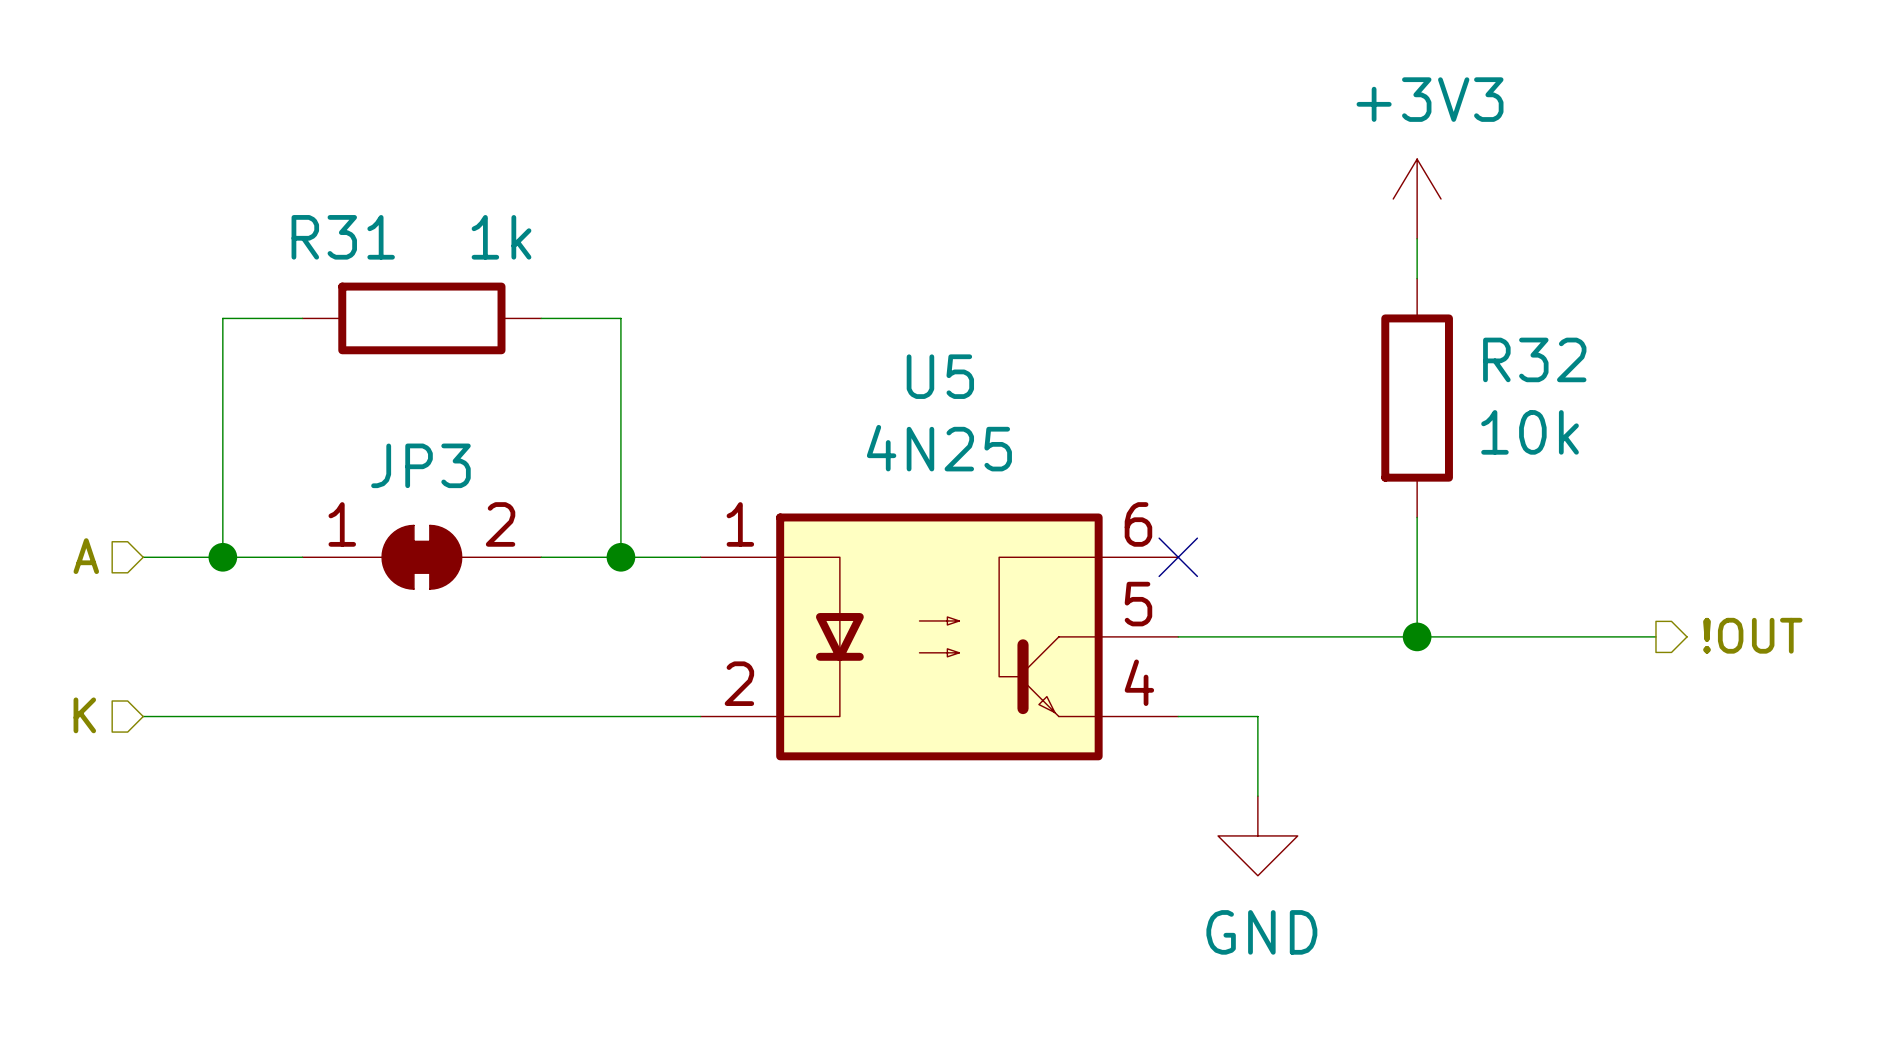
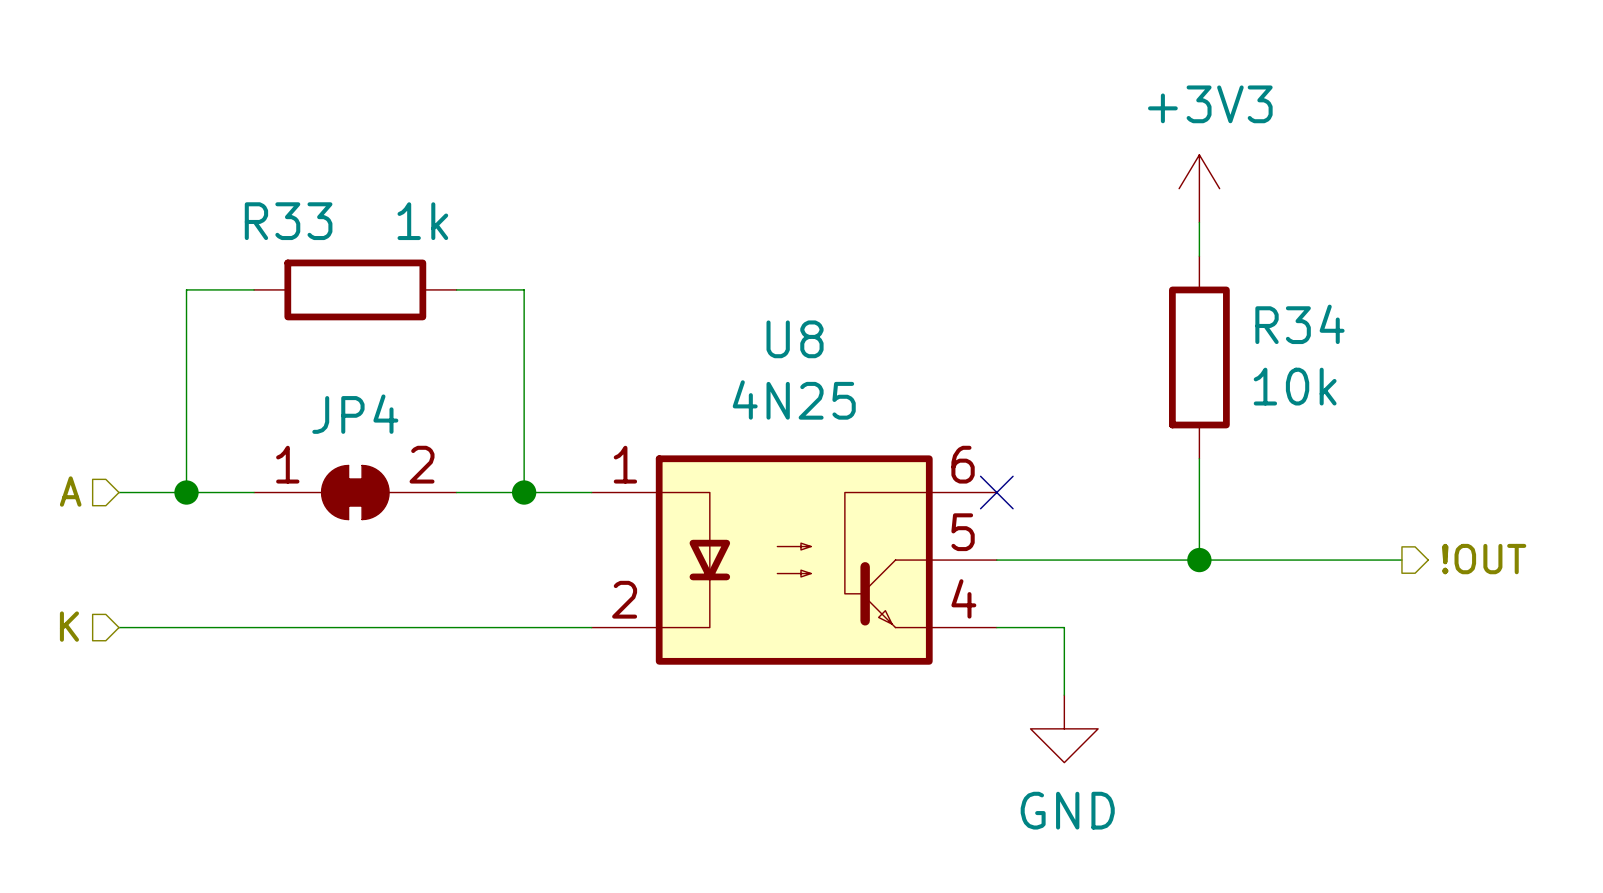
R31 name: R31 (343, 237) -> R33 (288, 221)
R32 name: R32 (1534, 359) -> R34 (1299, 324)
U5 name: U5 (940, 376) -> U8 (795, 339)
JP3 name: JP3 (420, 465) -> JP4 (355, 414)

